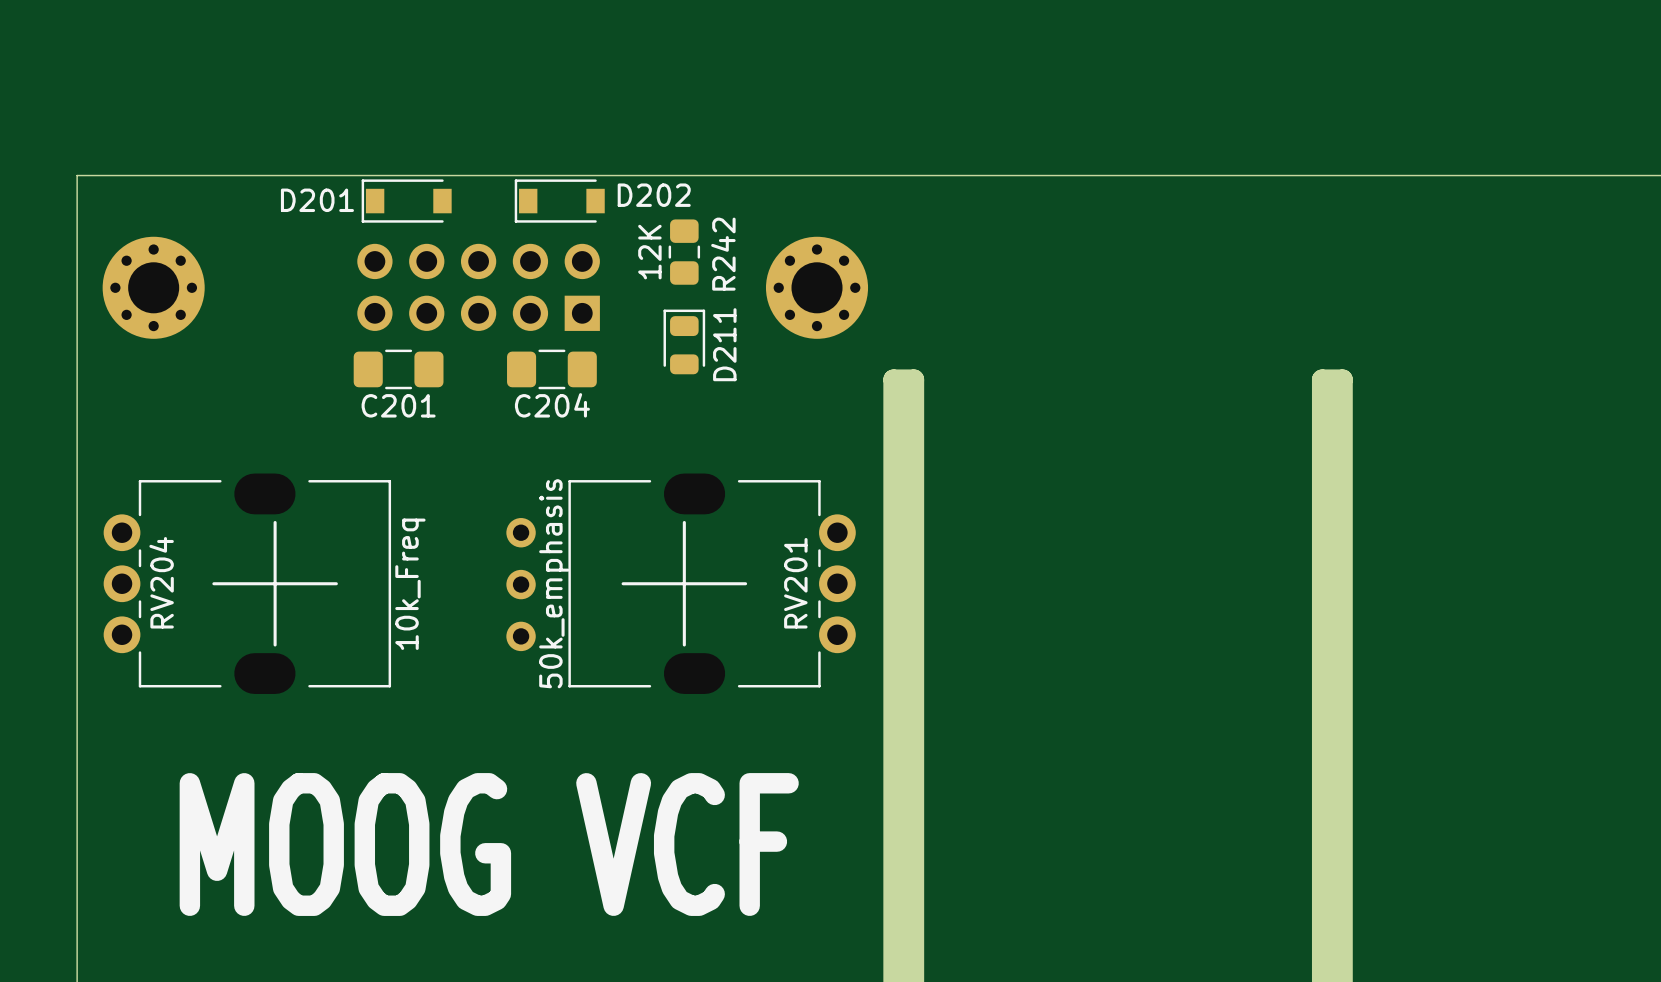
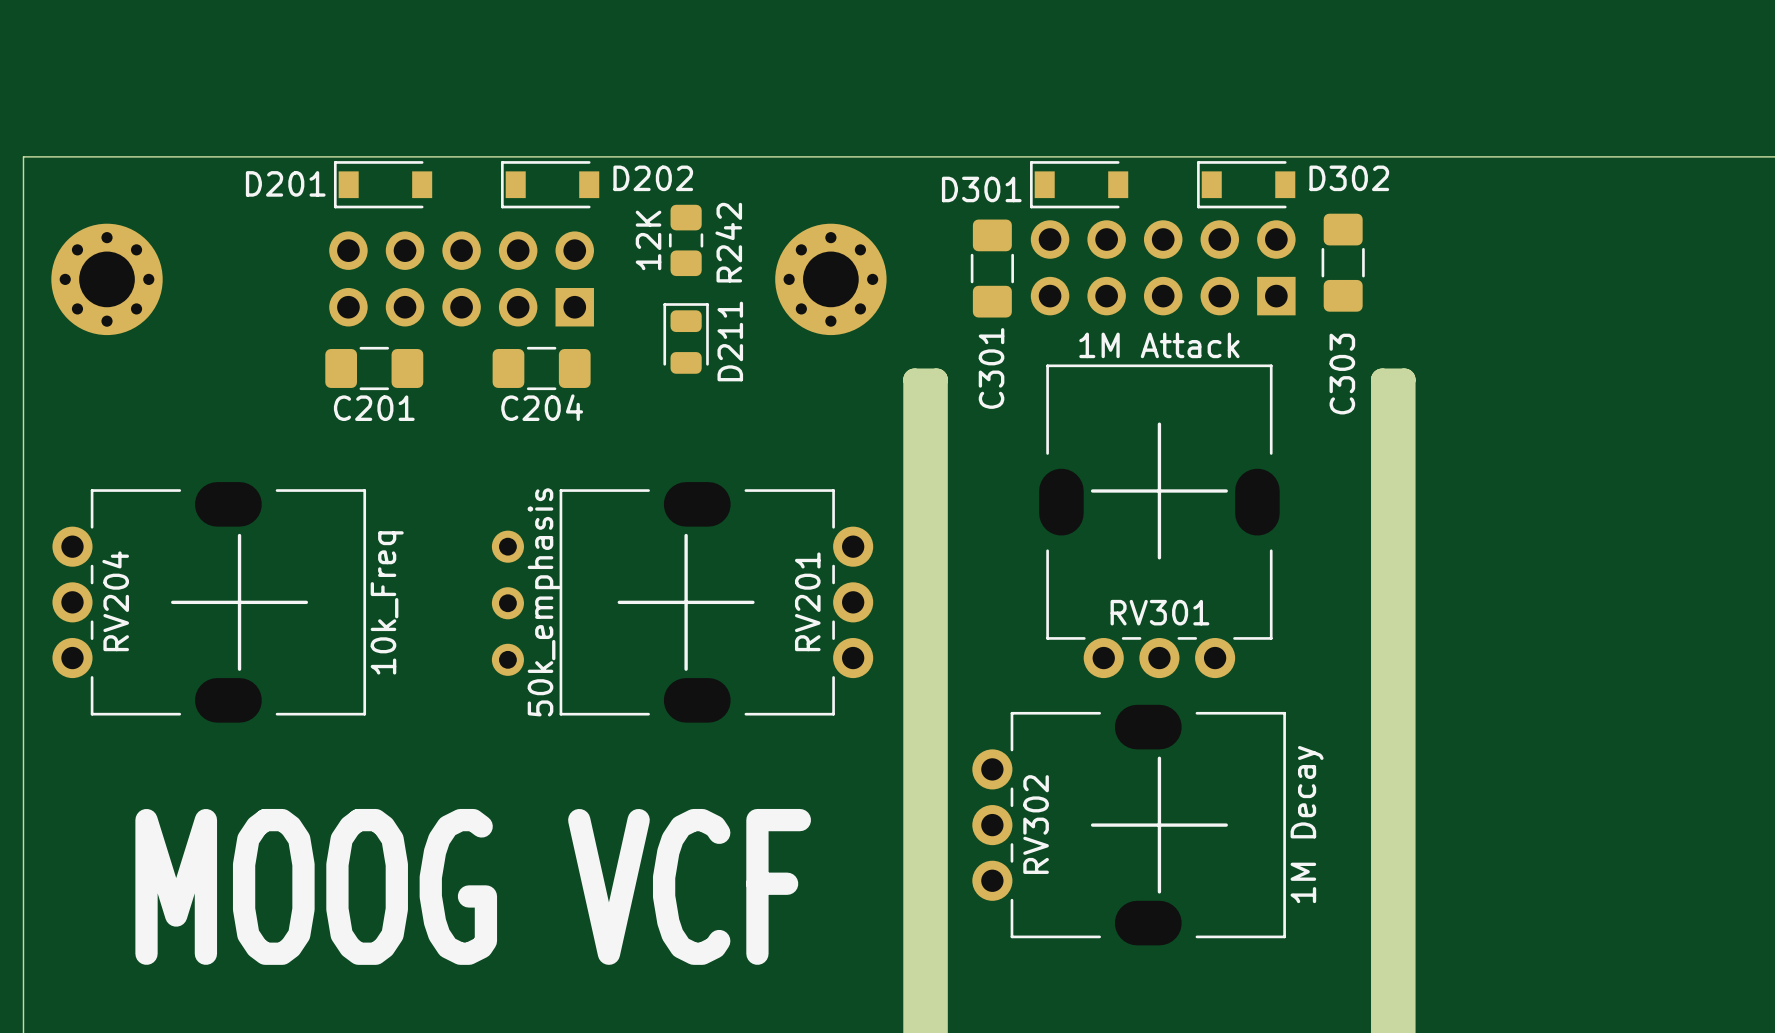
D301: none -> (1079, 184)
D302: none -> (1246, 184)
C303: none -> (1343, 262)
C301: none -> (992, 268)
part: none -> (1163, 267)
RV301: none -> 1M Attack (1159, 521)
RV302: none -> 1M Decay (1129, 825)

